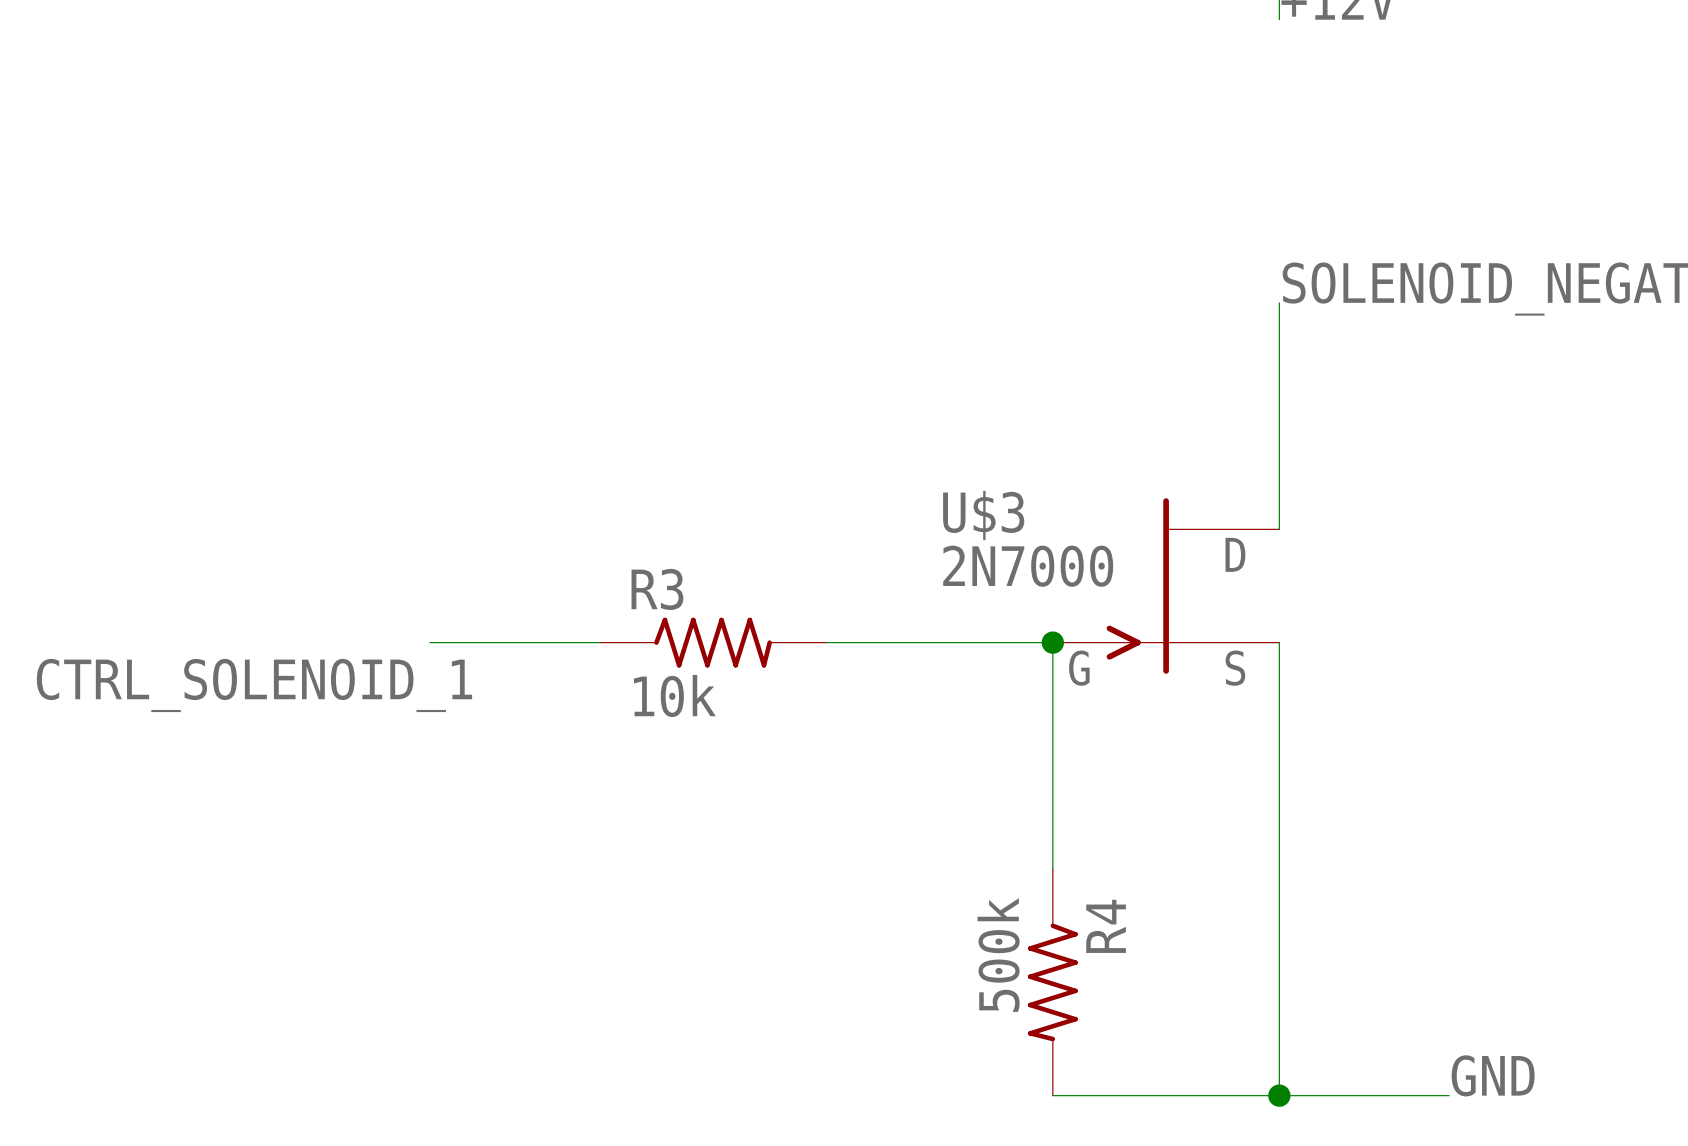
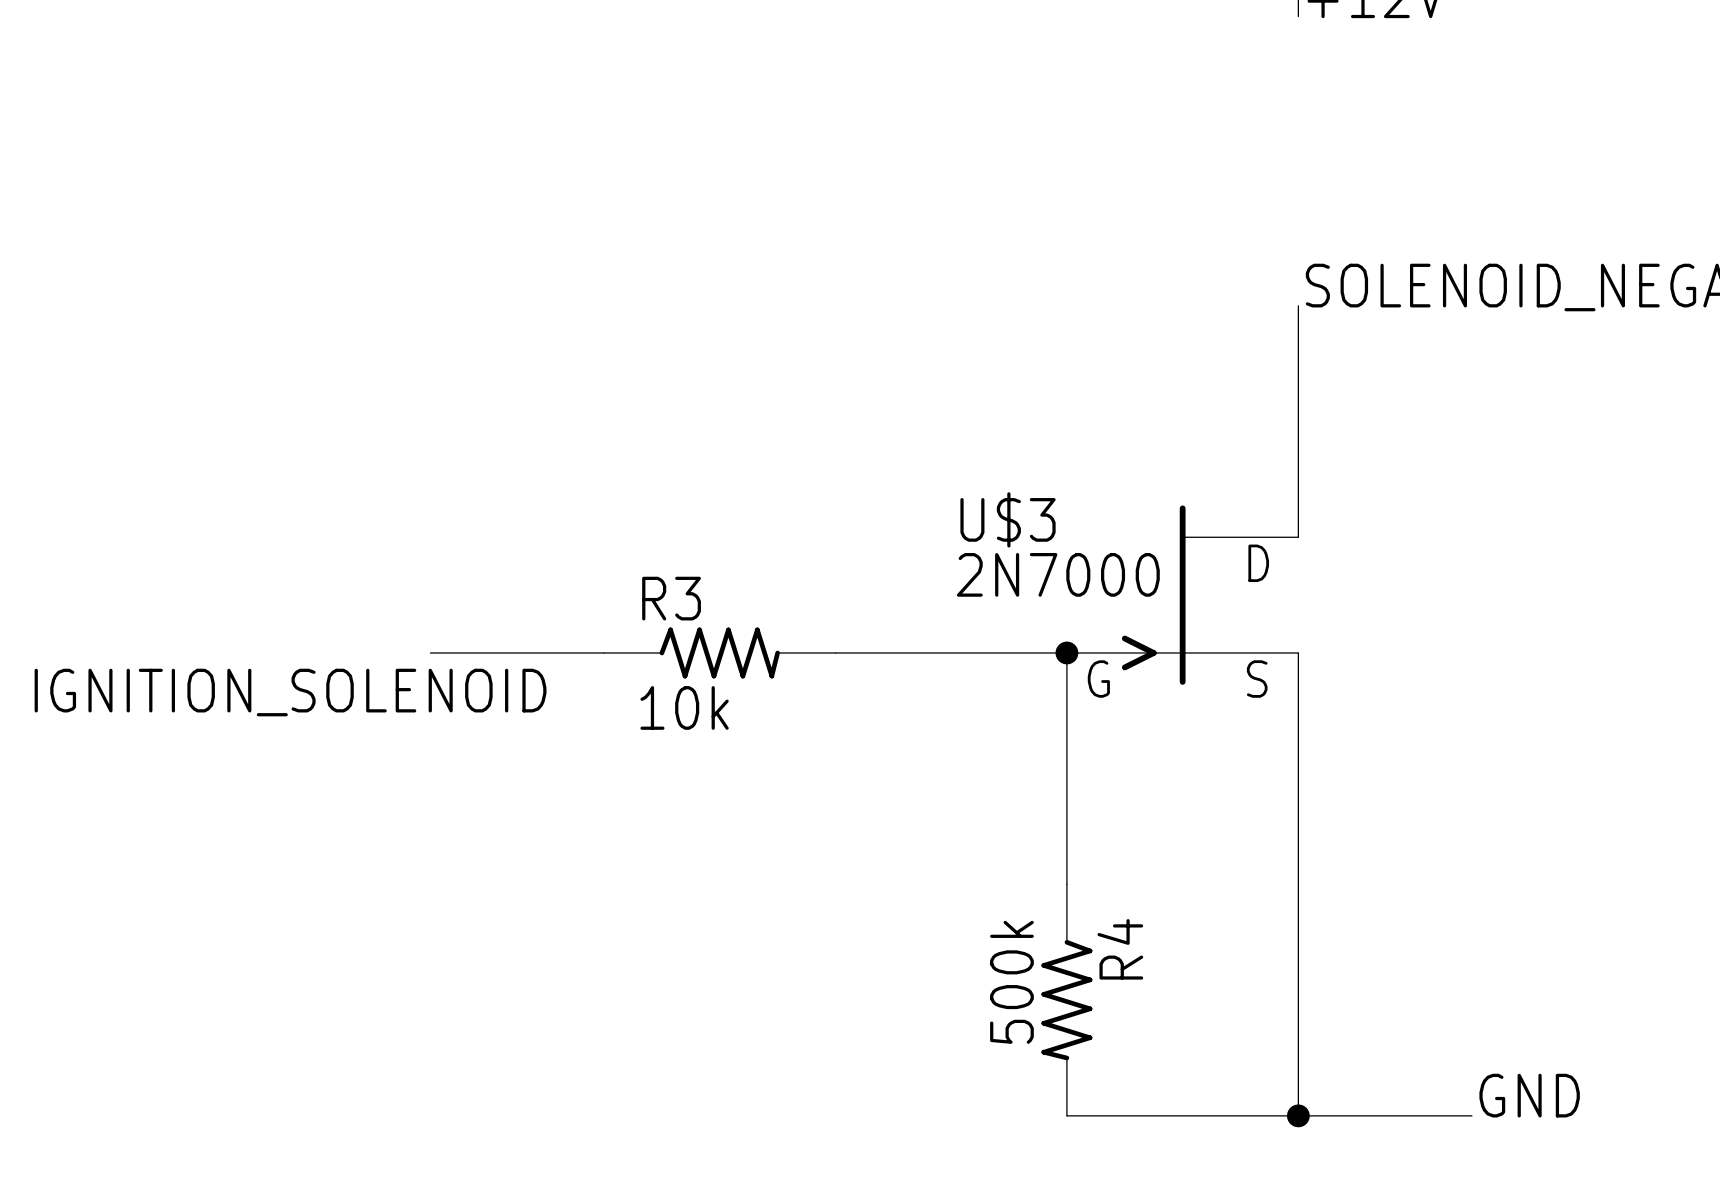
label: CTRL_SOLENOID_1 (254, 685) -> IGNITION_SOLENOID (290, 692)

